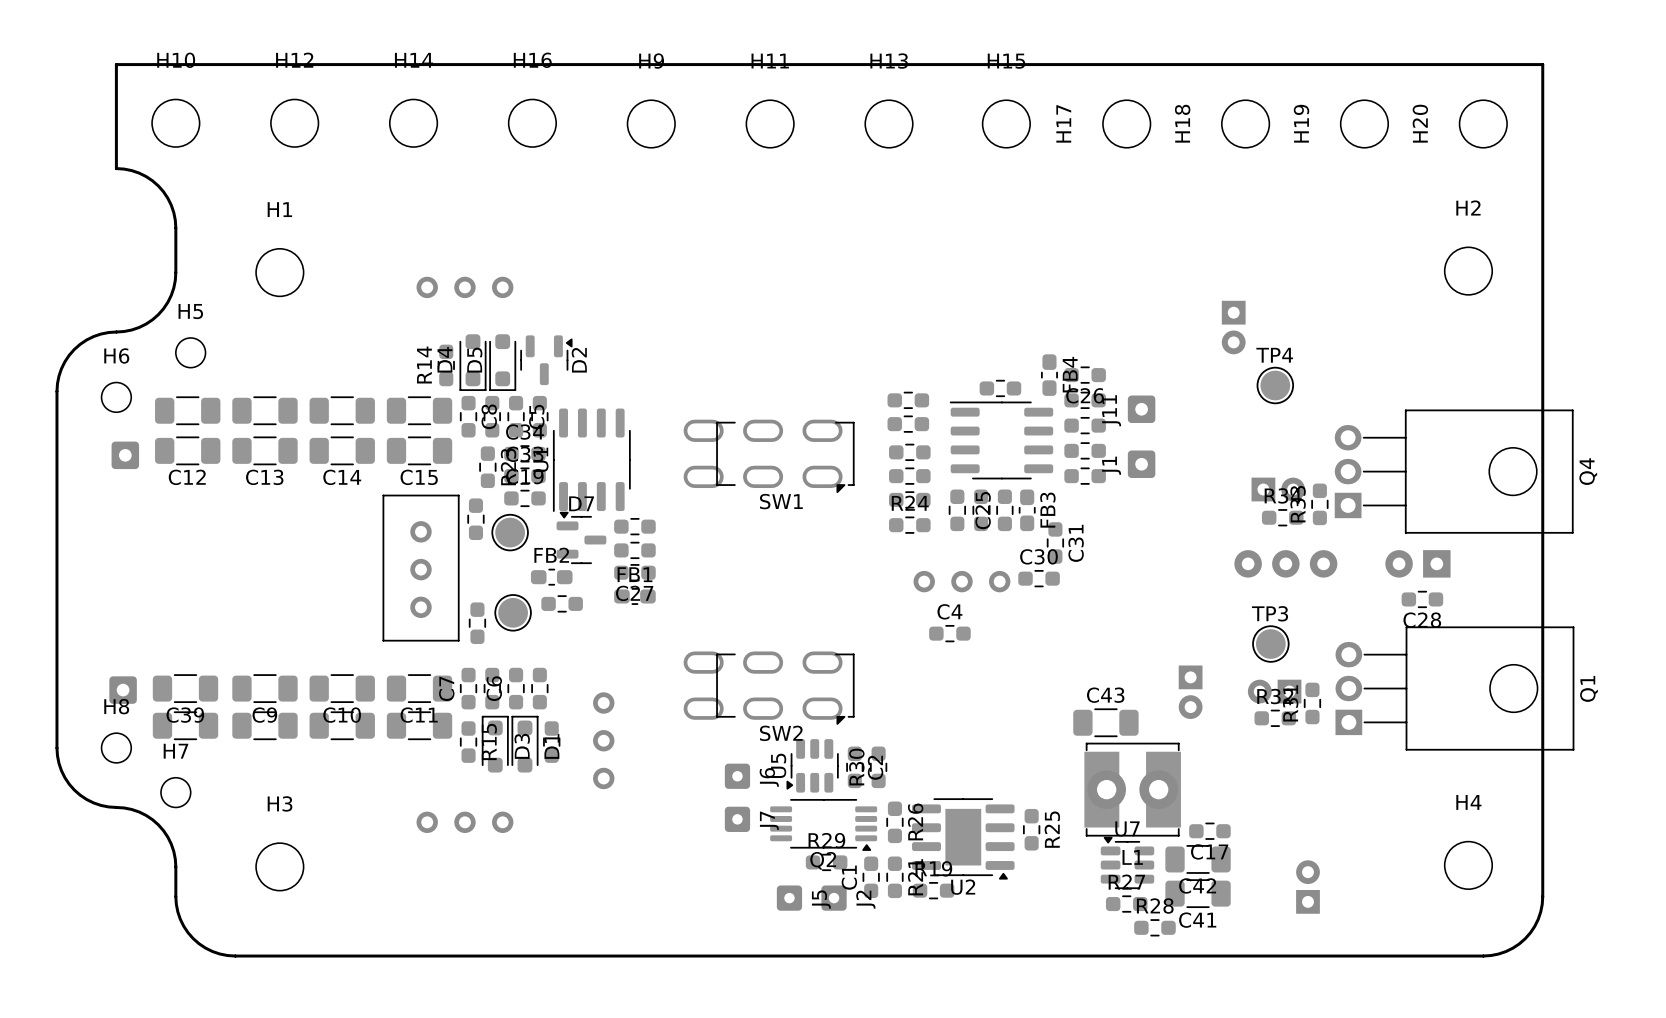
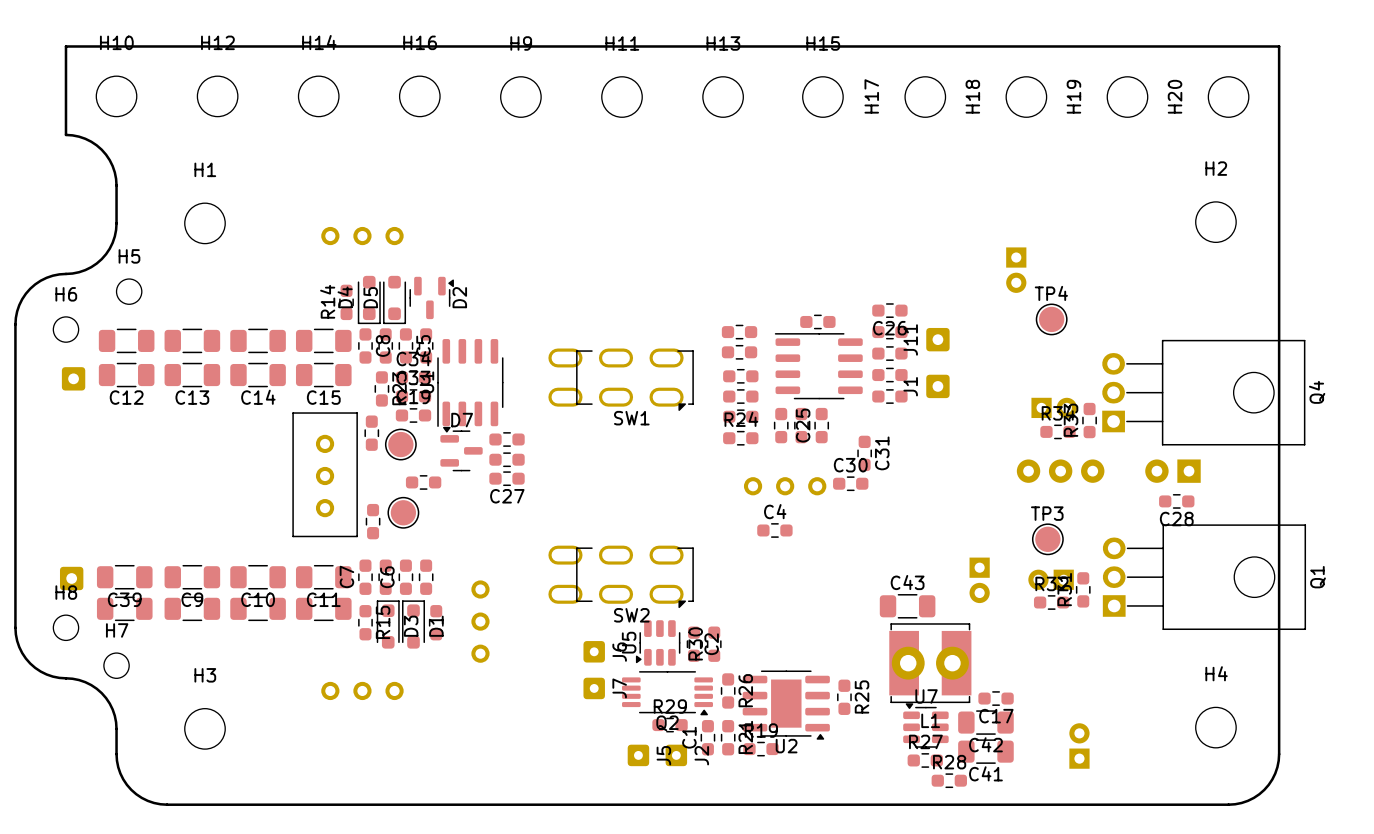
FB4: (1049, 375) -> none
FB3: (1027, 510) -> none
FB2: (551, 577) -> none
FB1: (634, 596) -> none
part position: (562, 603) -> (423, 482)

